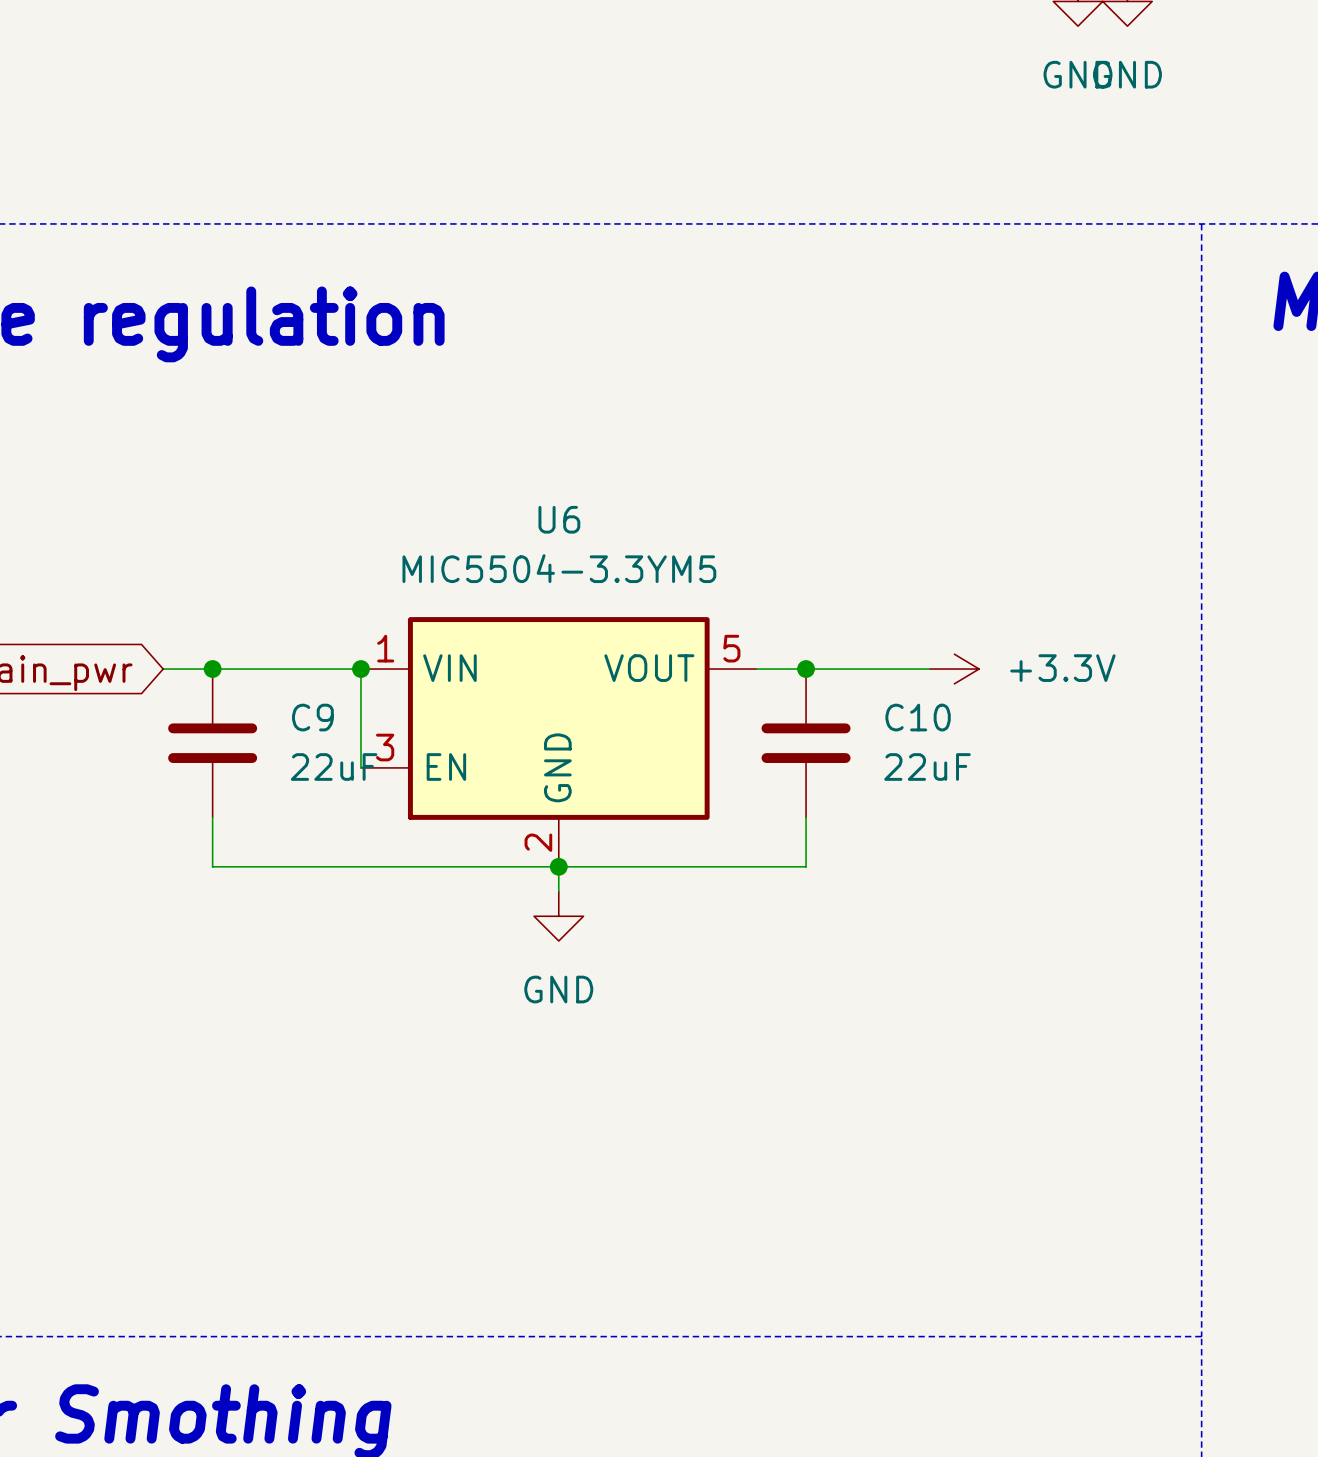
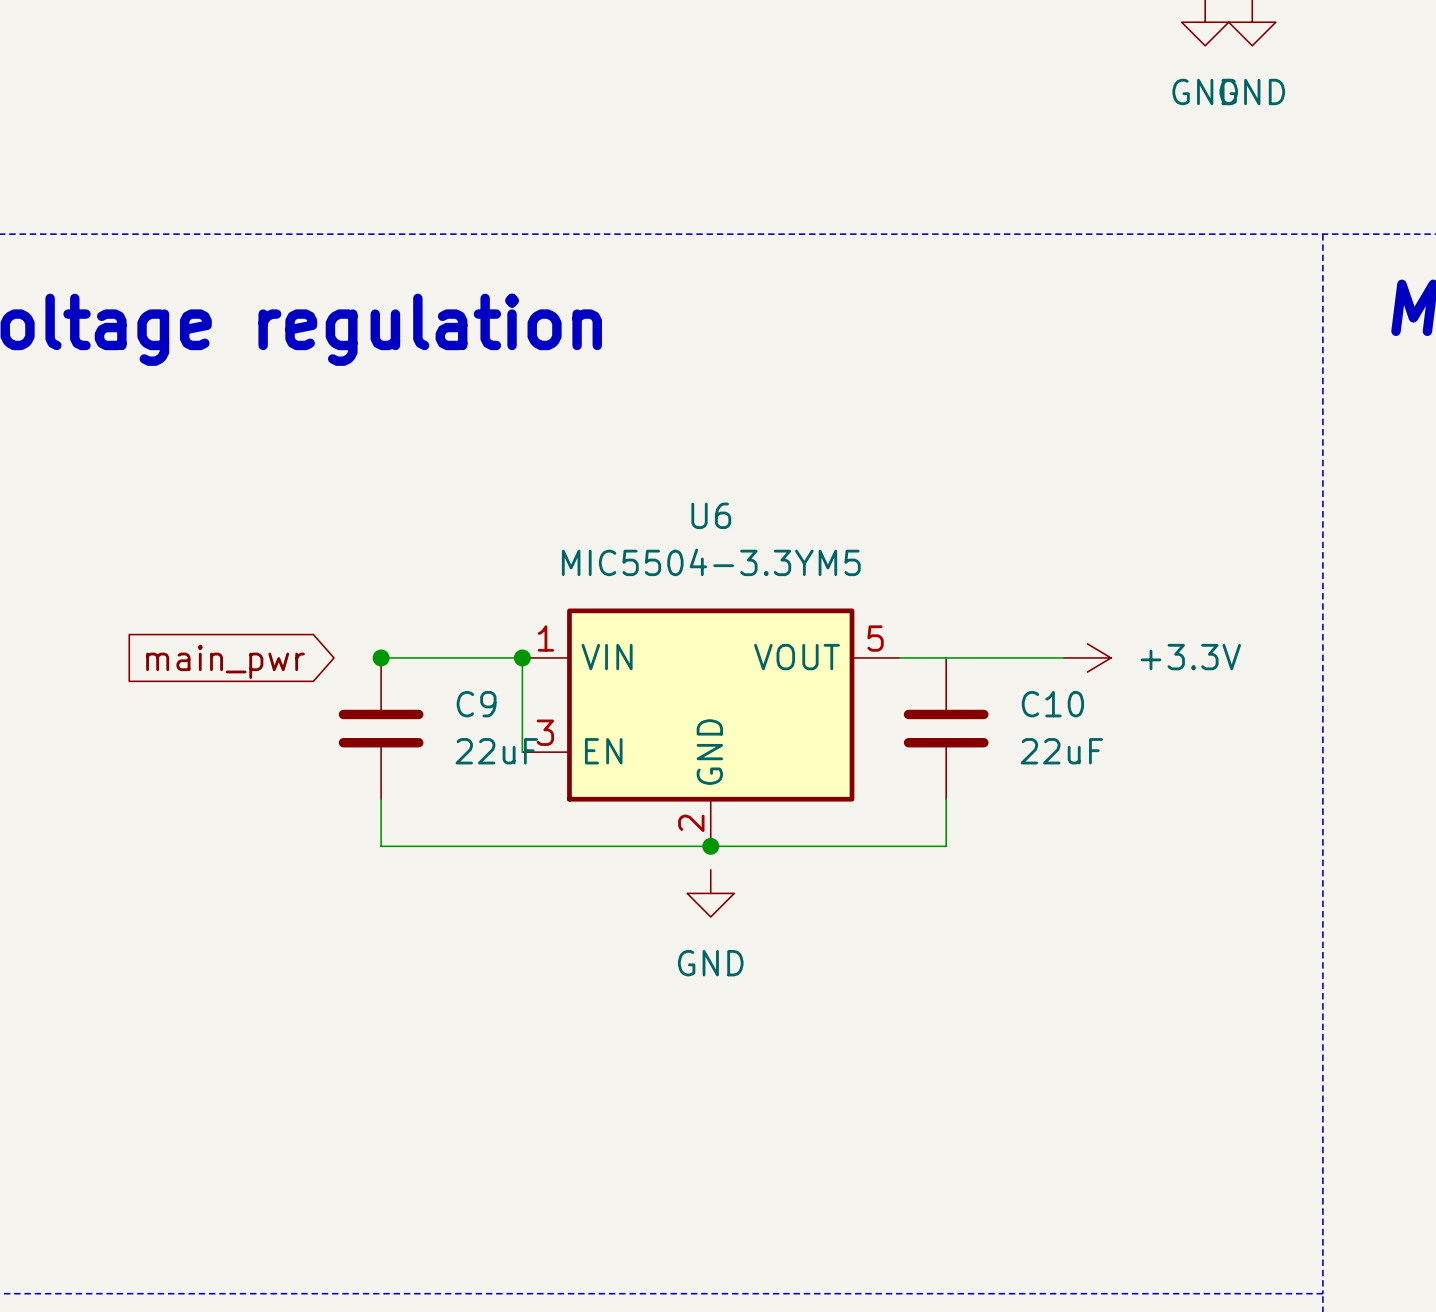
wire: (163, 669) (212, 669) -> none
junction: (806, 669) -> none
wire: (558, 866) (558, 891) -> none

